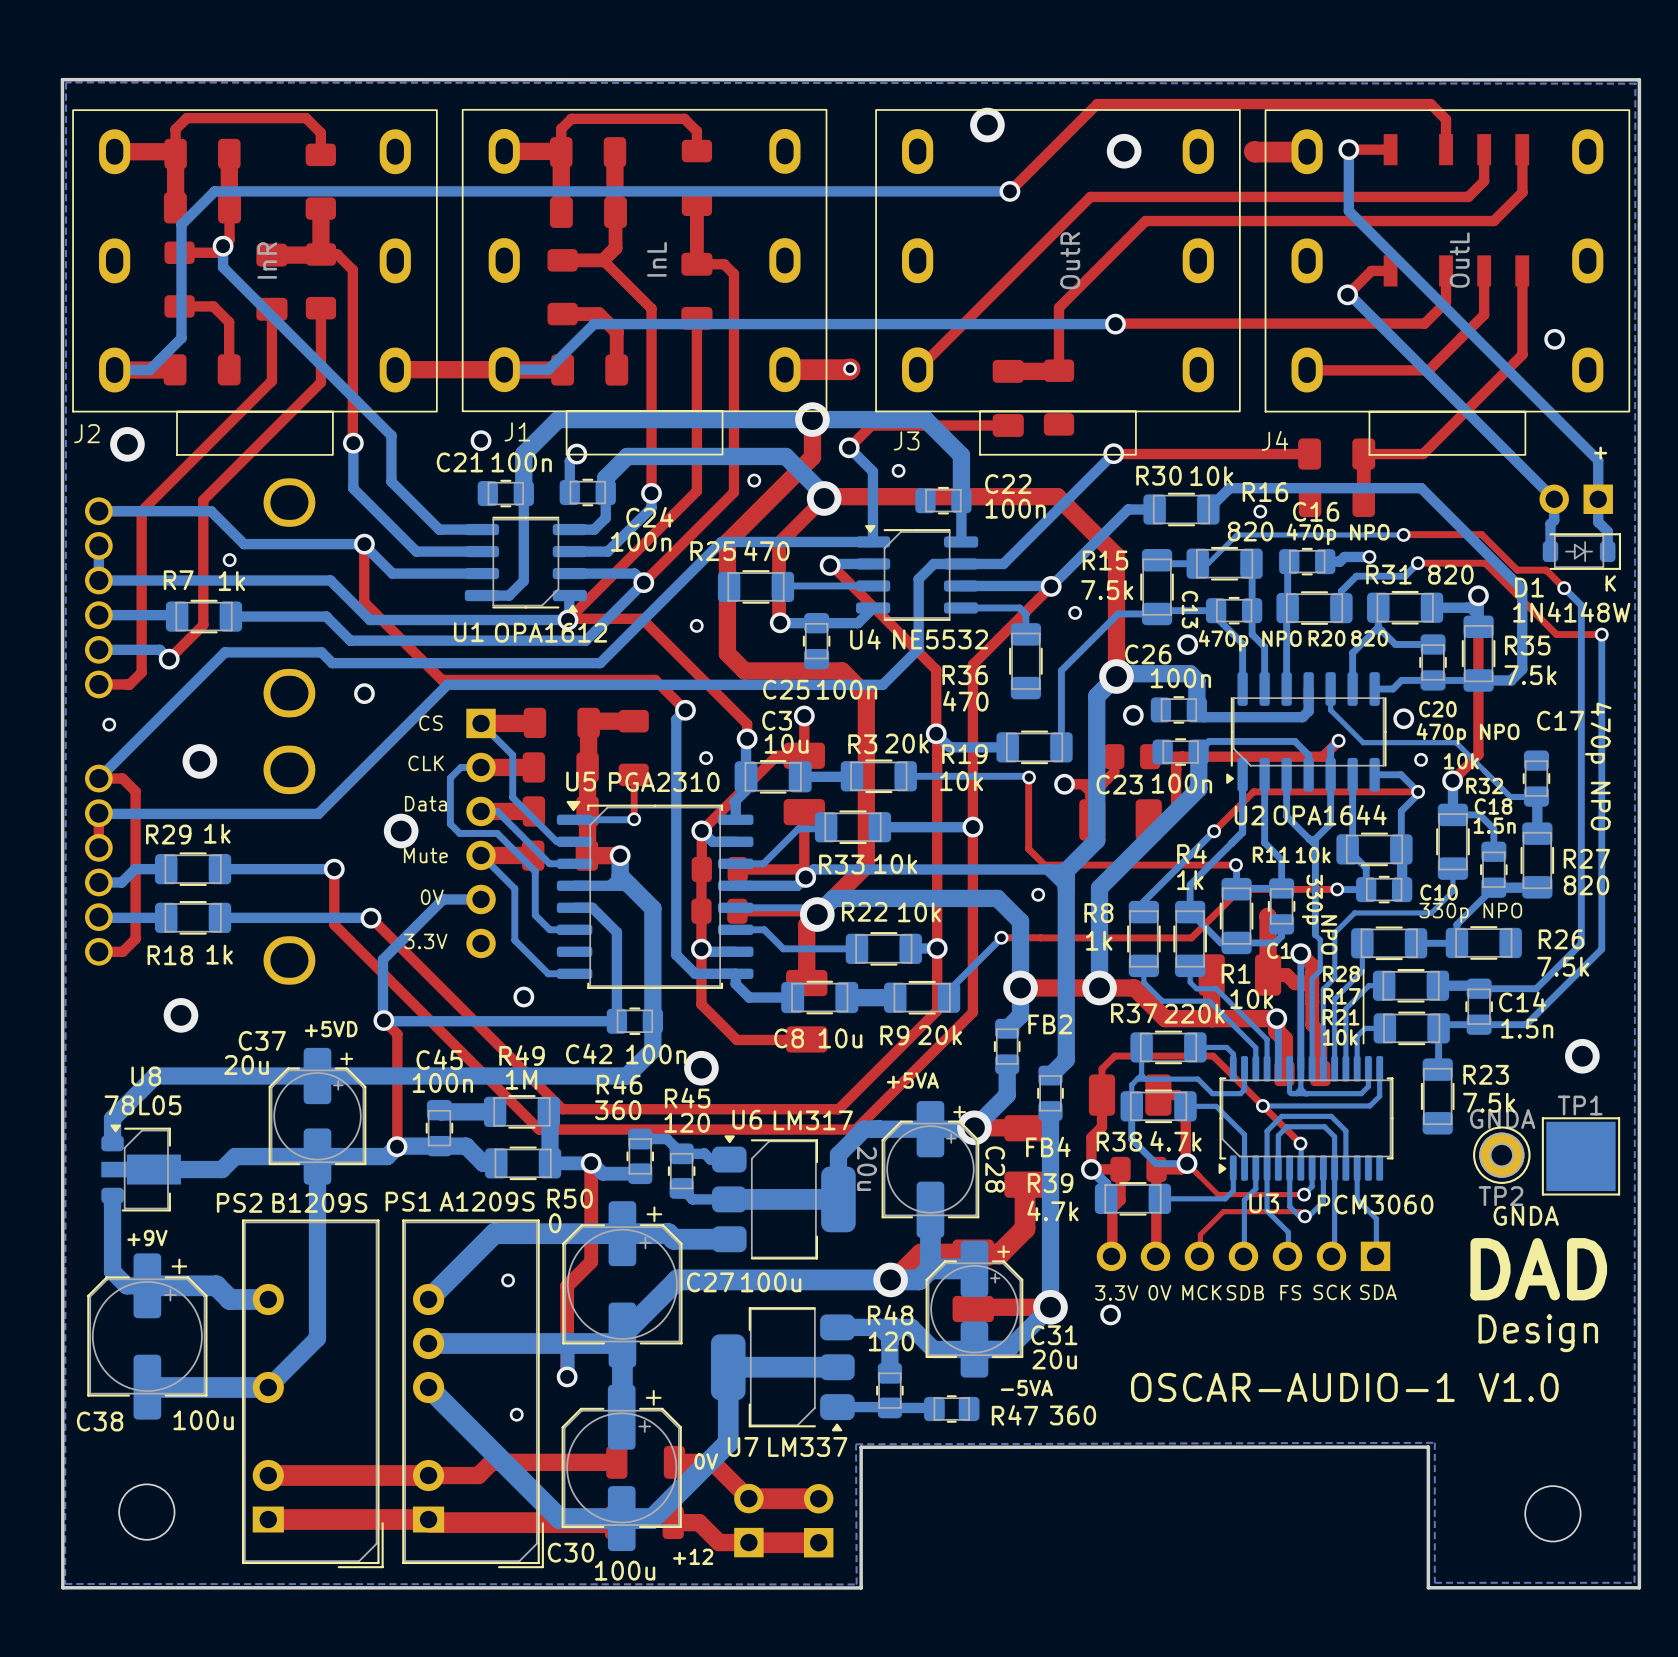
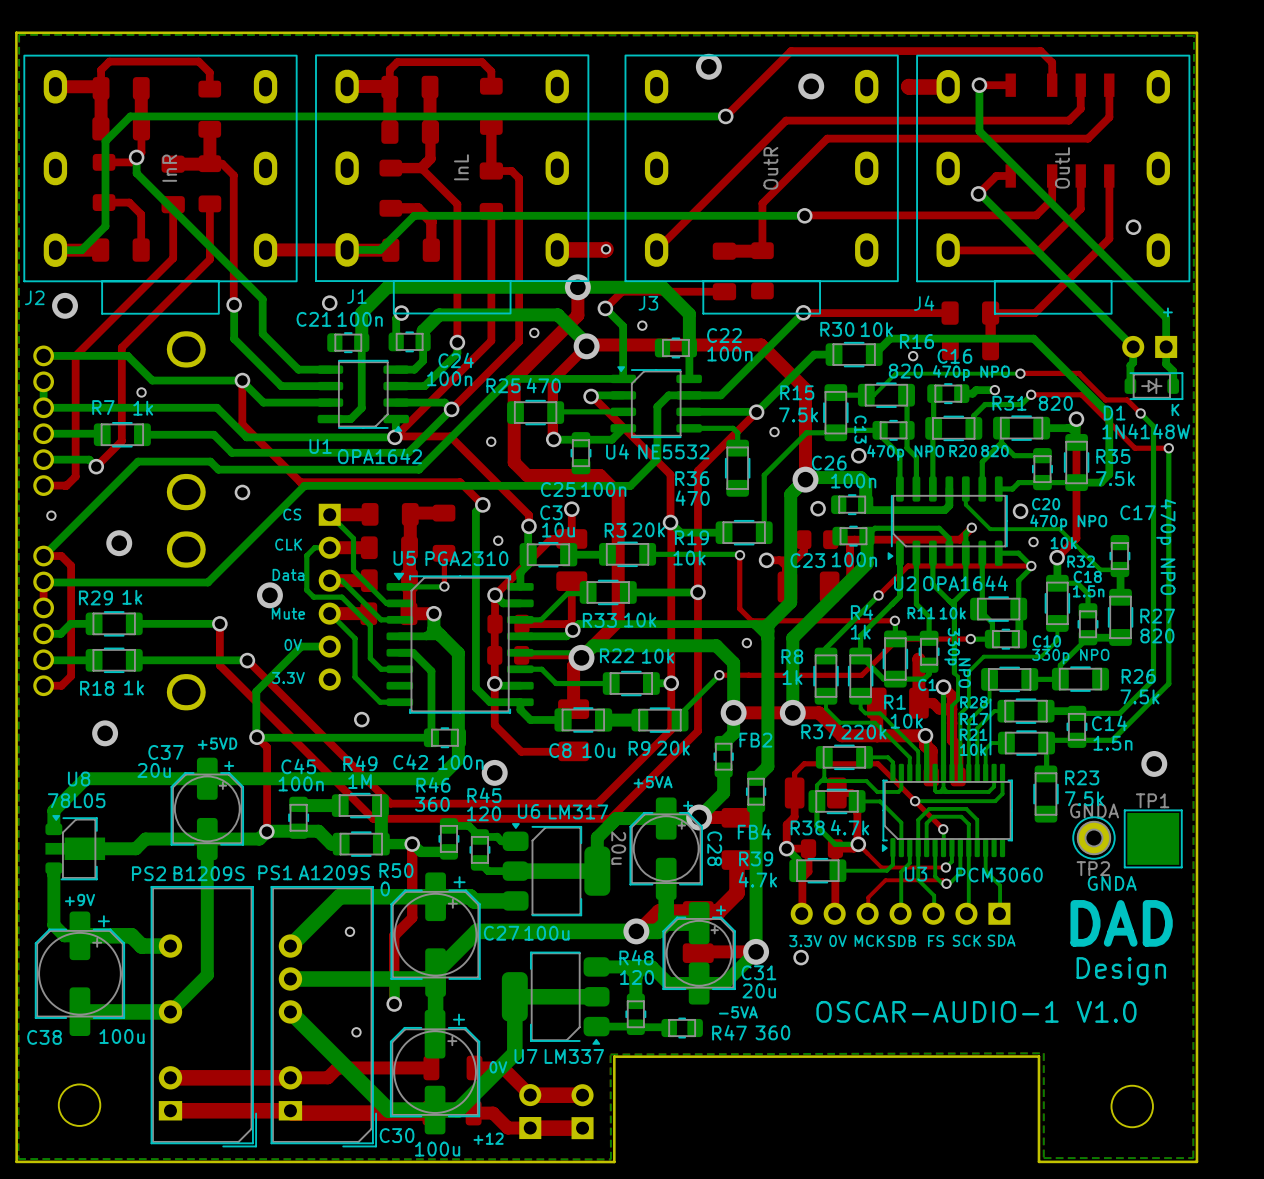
U1 value: OPA1612 (551, 632) -> OPA1642 (379, 456)

